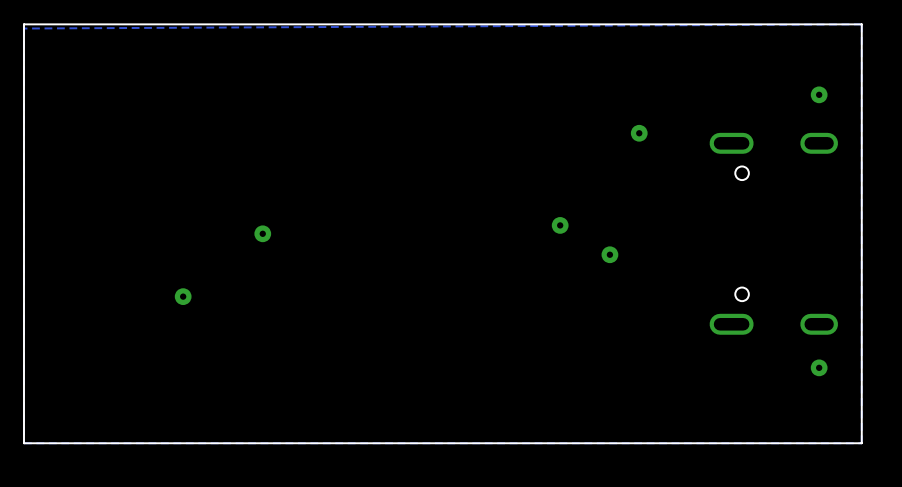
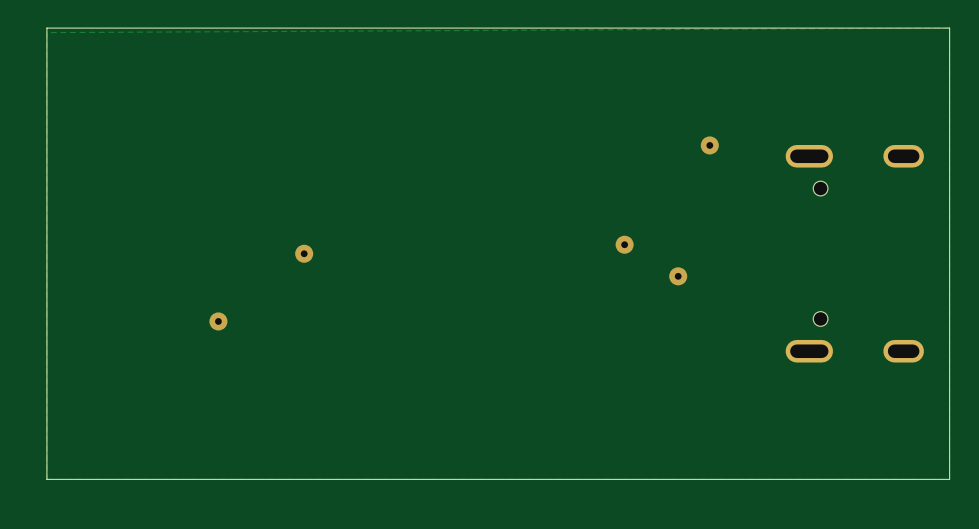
via: (819, 94) -> none
via: (819, 367) -> none

